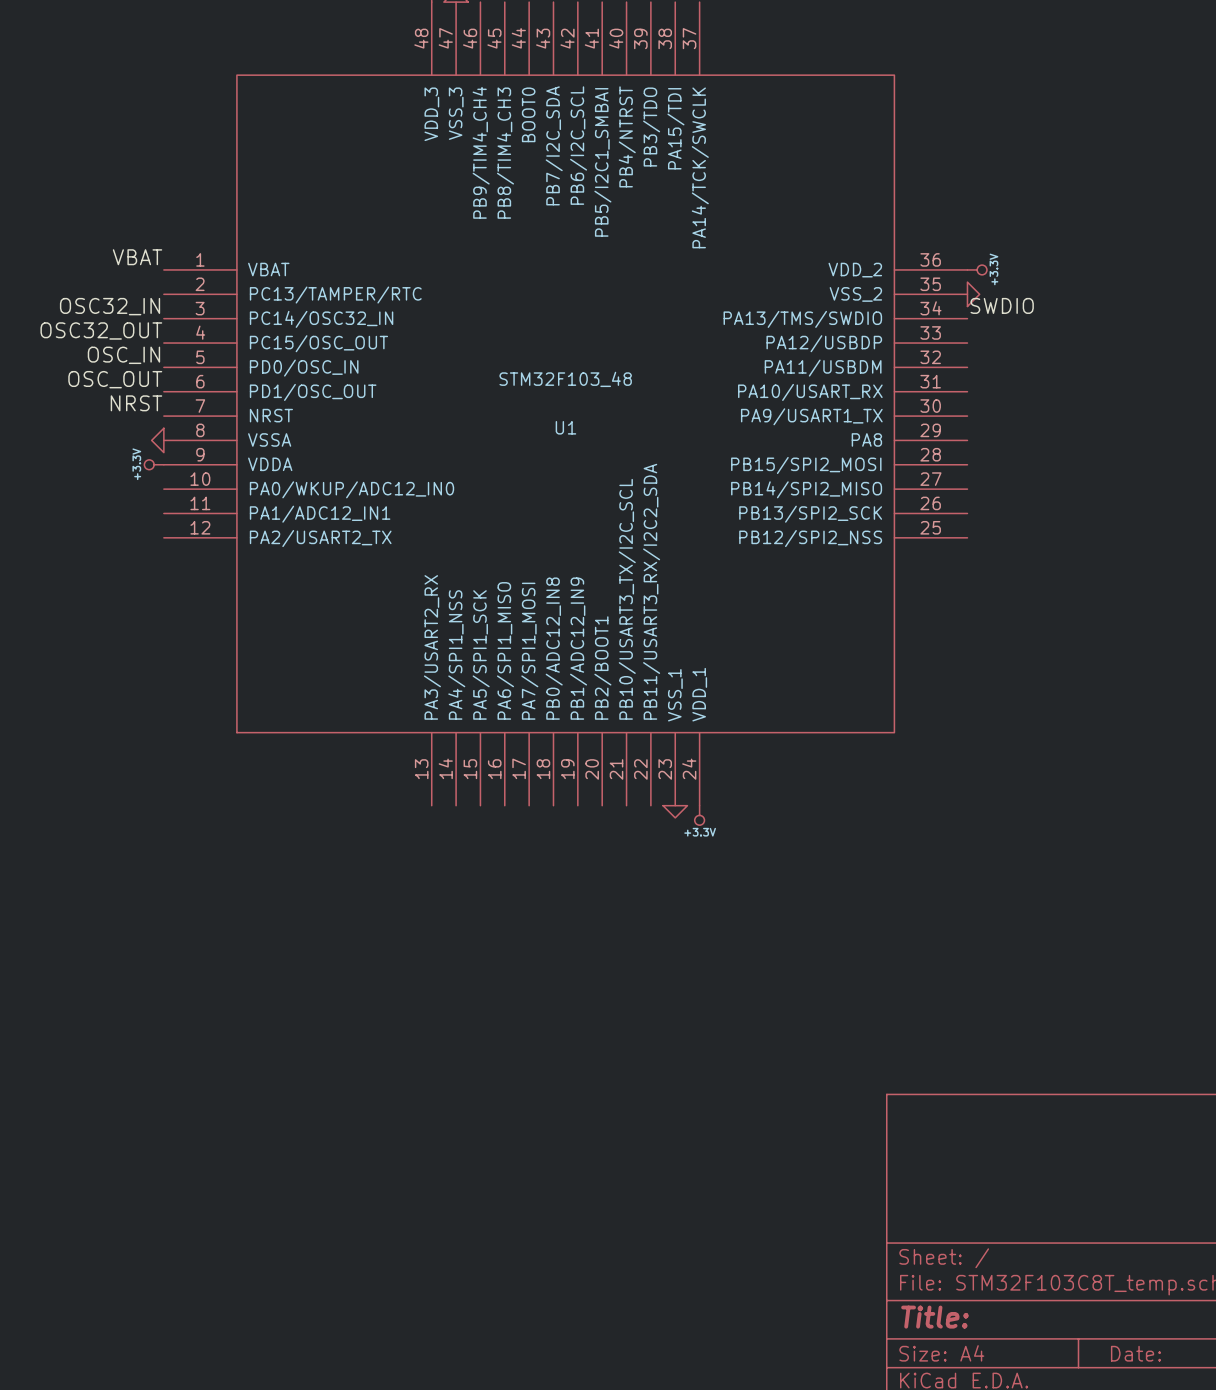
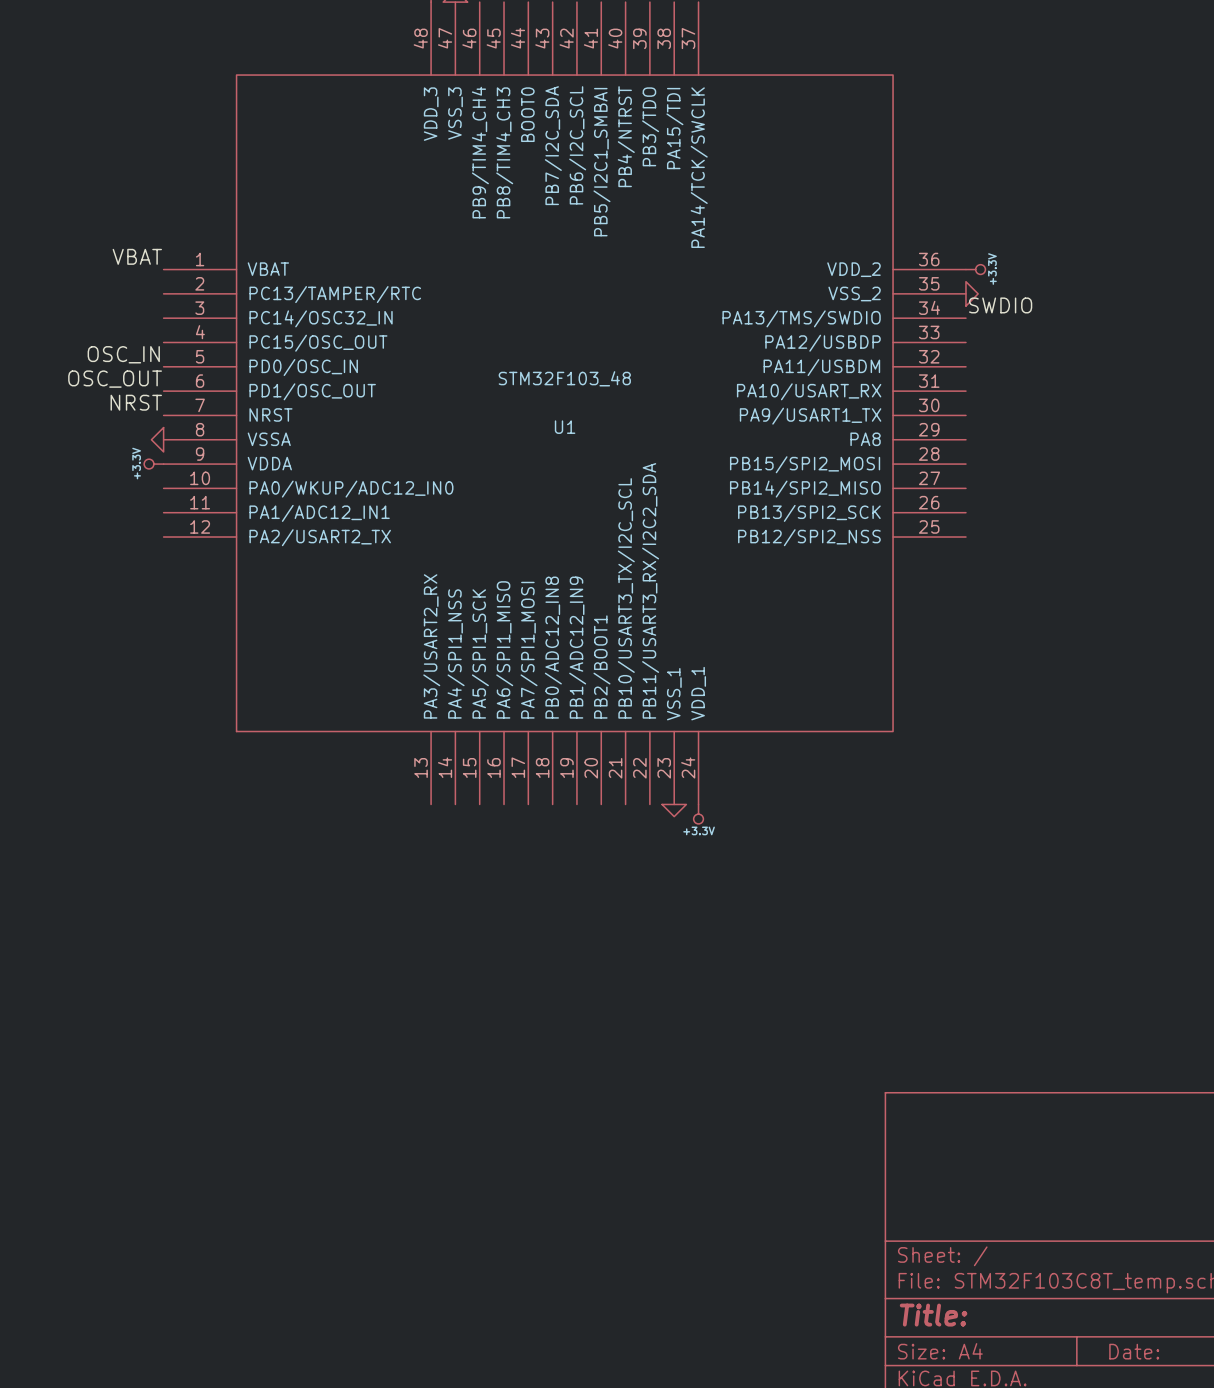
label: OSC32_IN (110, 306) -> none
label: OSC32_OUT (101, 330) -> none

